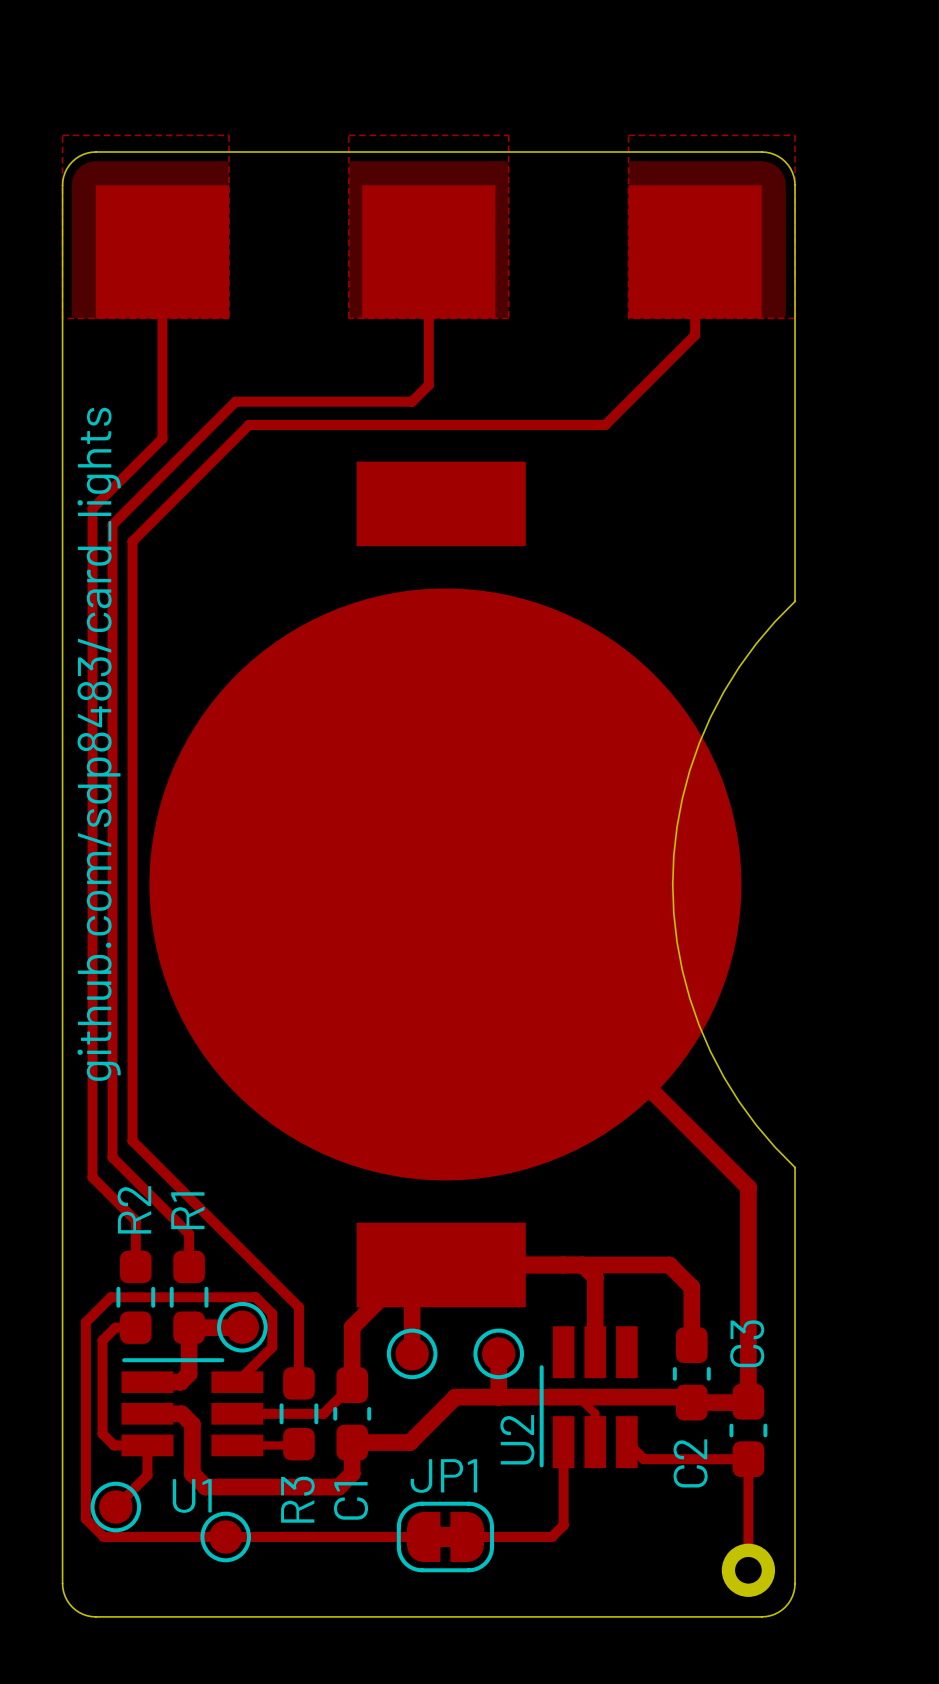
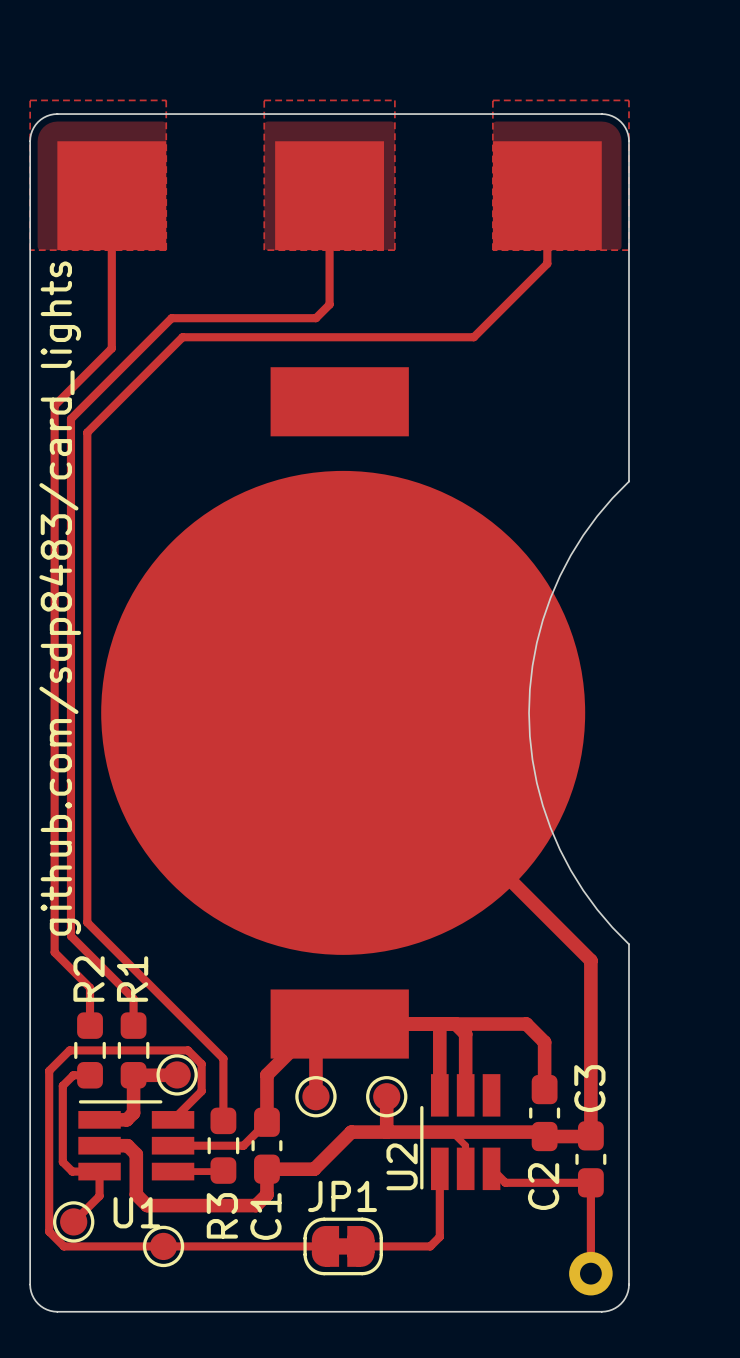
track: none -> (439, 1024) (439, 1095)

